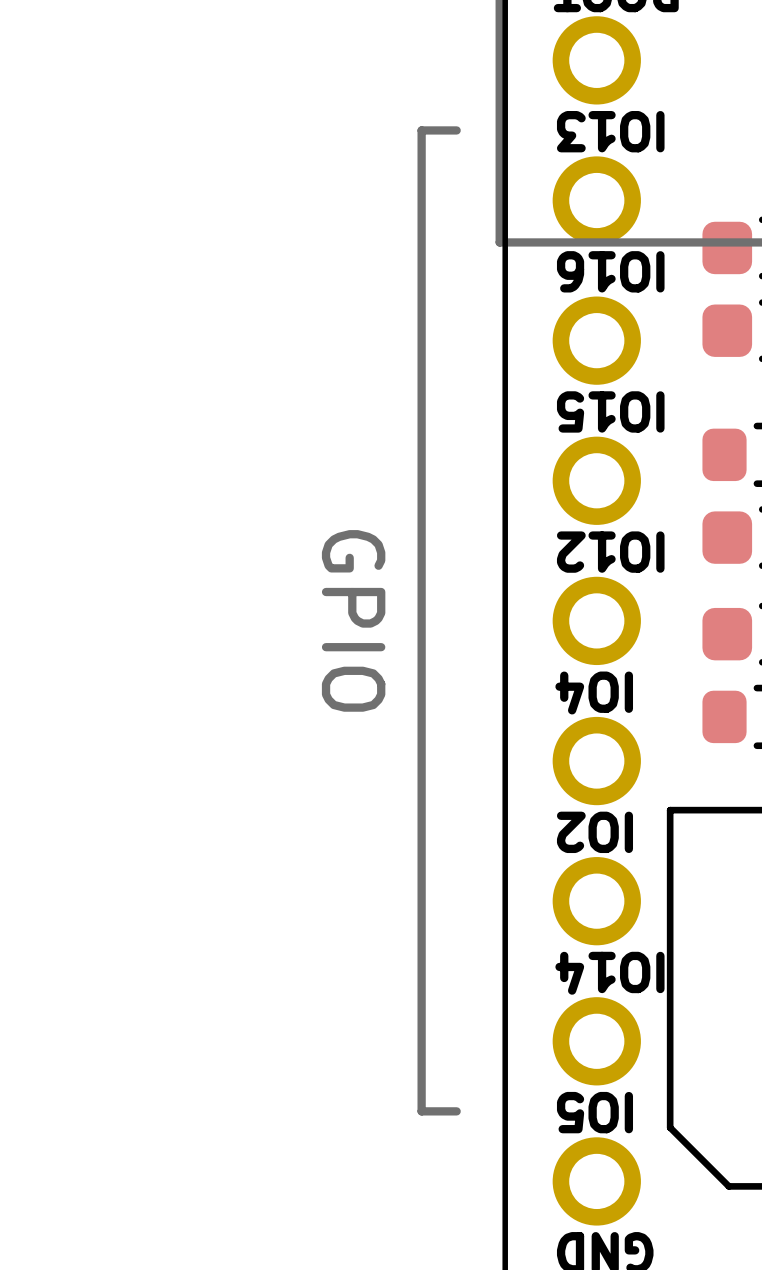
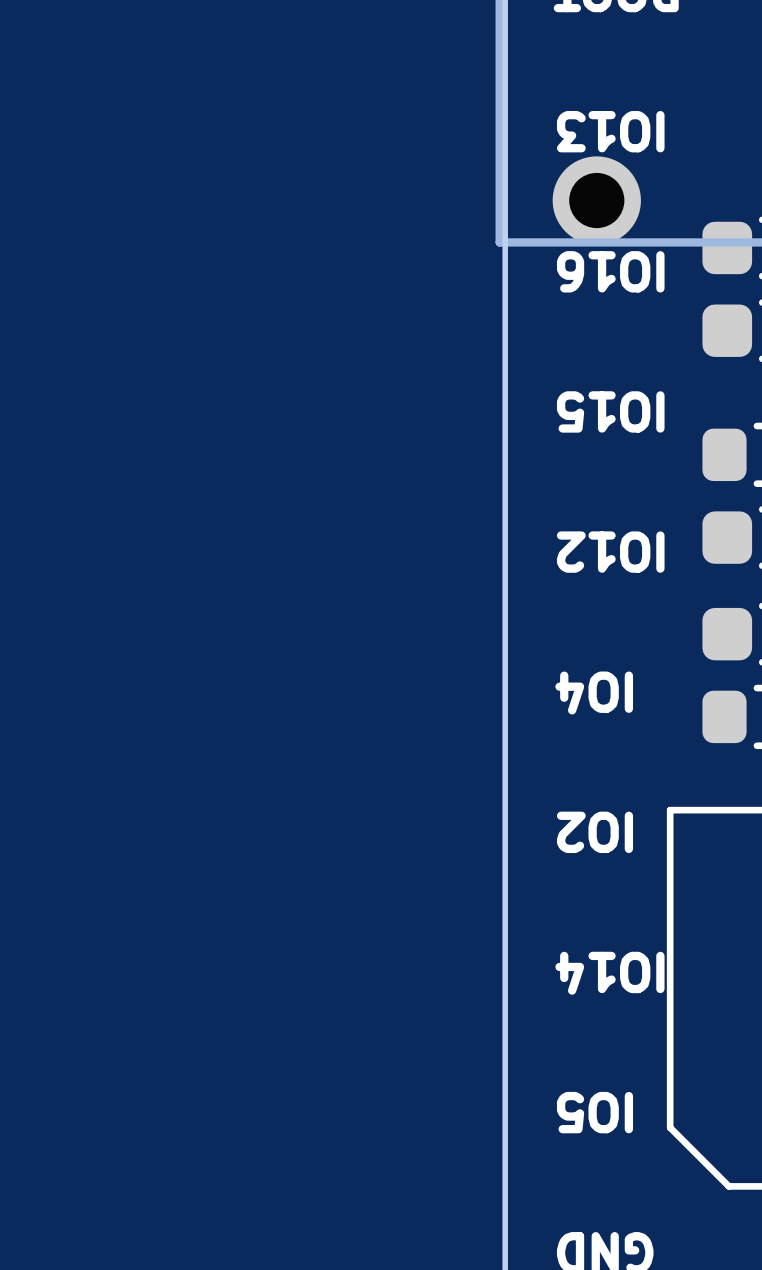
part: (596, 60) -> none
line: (456, 130) (421, 130) (421, 1111) (456, 1111) -> none
part: (596, 340) -> none
part: (596, 480) -> none
text: GPIO (353, 620) -> none
part: (596, 620) -> none
part: (596, 761) -> none
part: (596, 901) -> none
part: (596, 1041) -> none
part: (596, 1181) -> none

